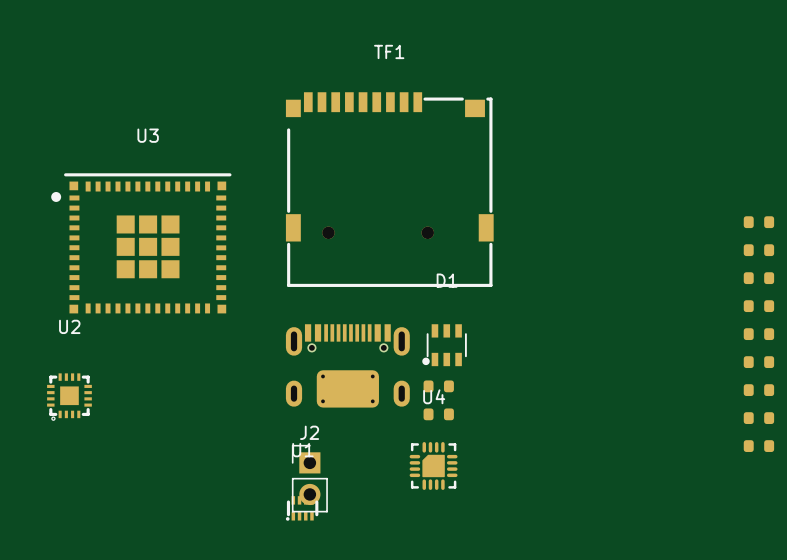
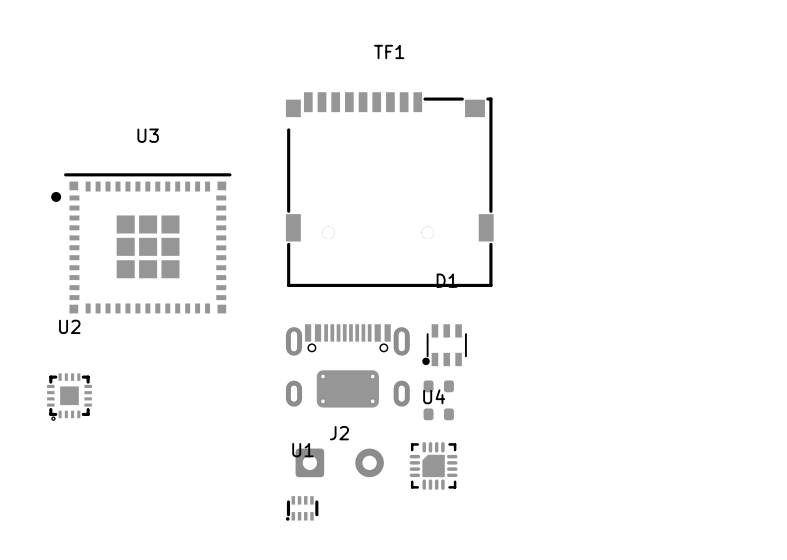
part: (758, 222) -> none
part: (758, 250) -> none
part: (758, 278) -> none
part: (758, 306) -> none
part: (758, 334) -> none
part: (758, 362) -> none
part: (758, 390) -> none
part: (758, 418) -> none
J2 footprint: [291, 444, 328, 513] -> [295, 448, 384, 478]
part: (758, 446) -> none

